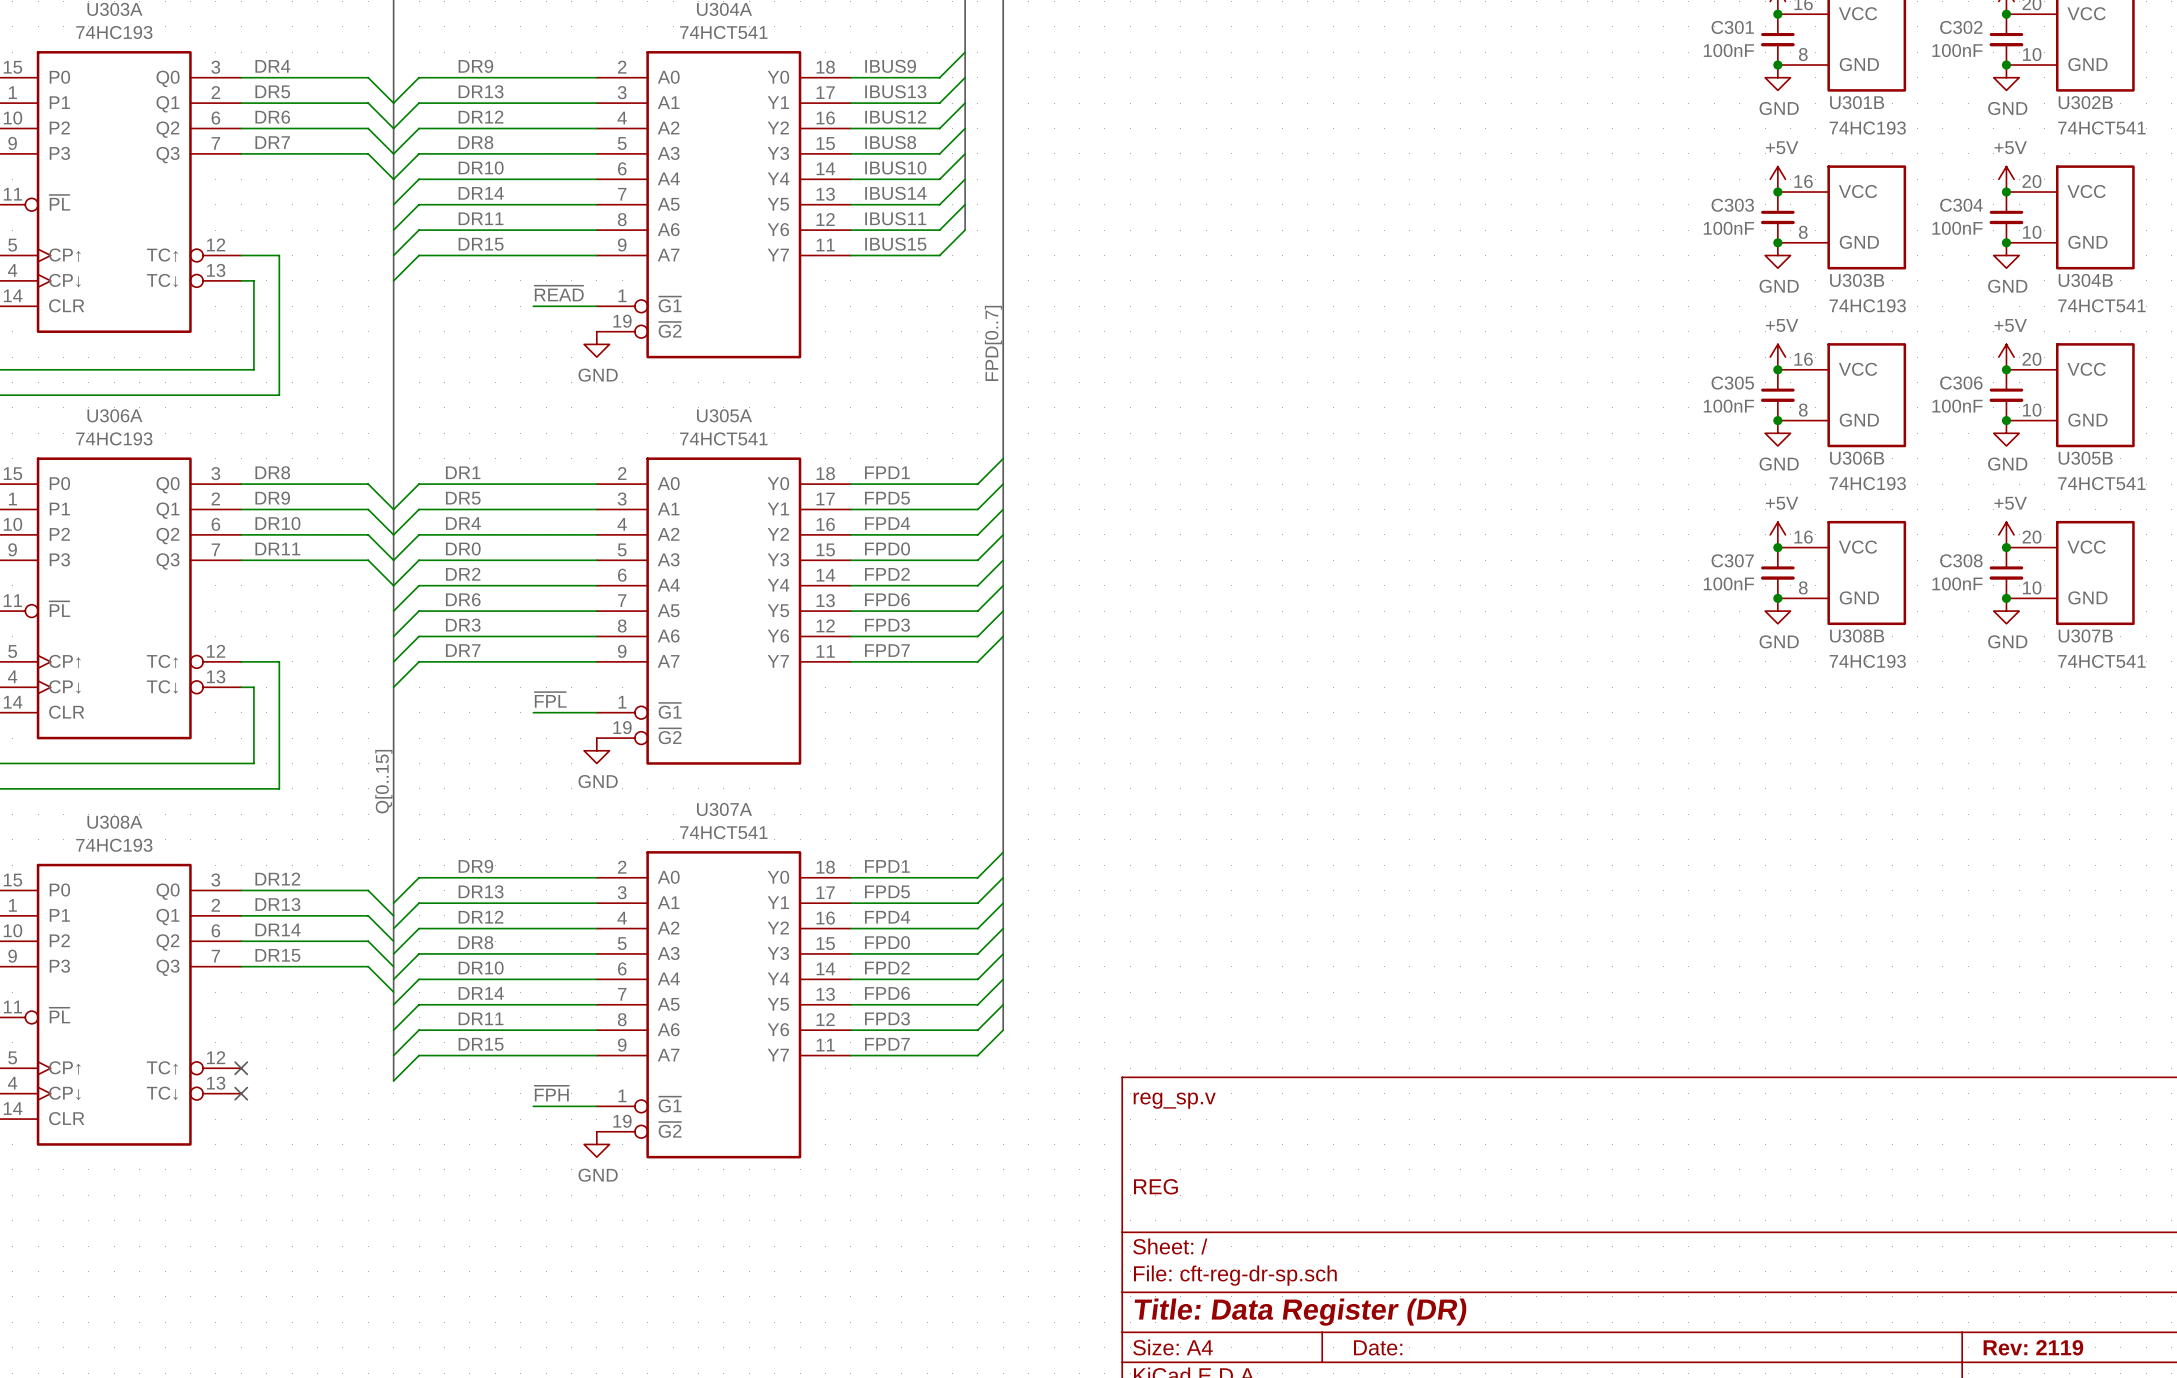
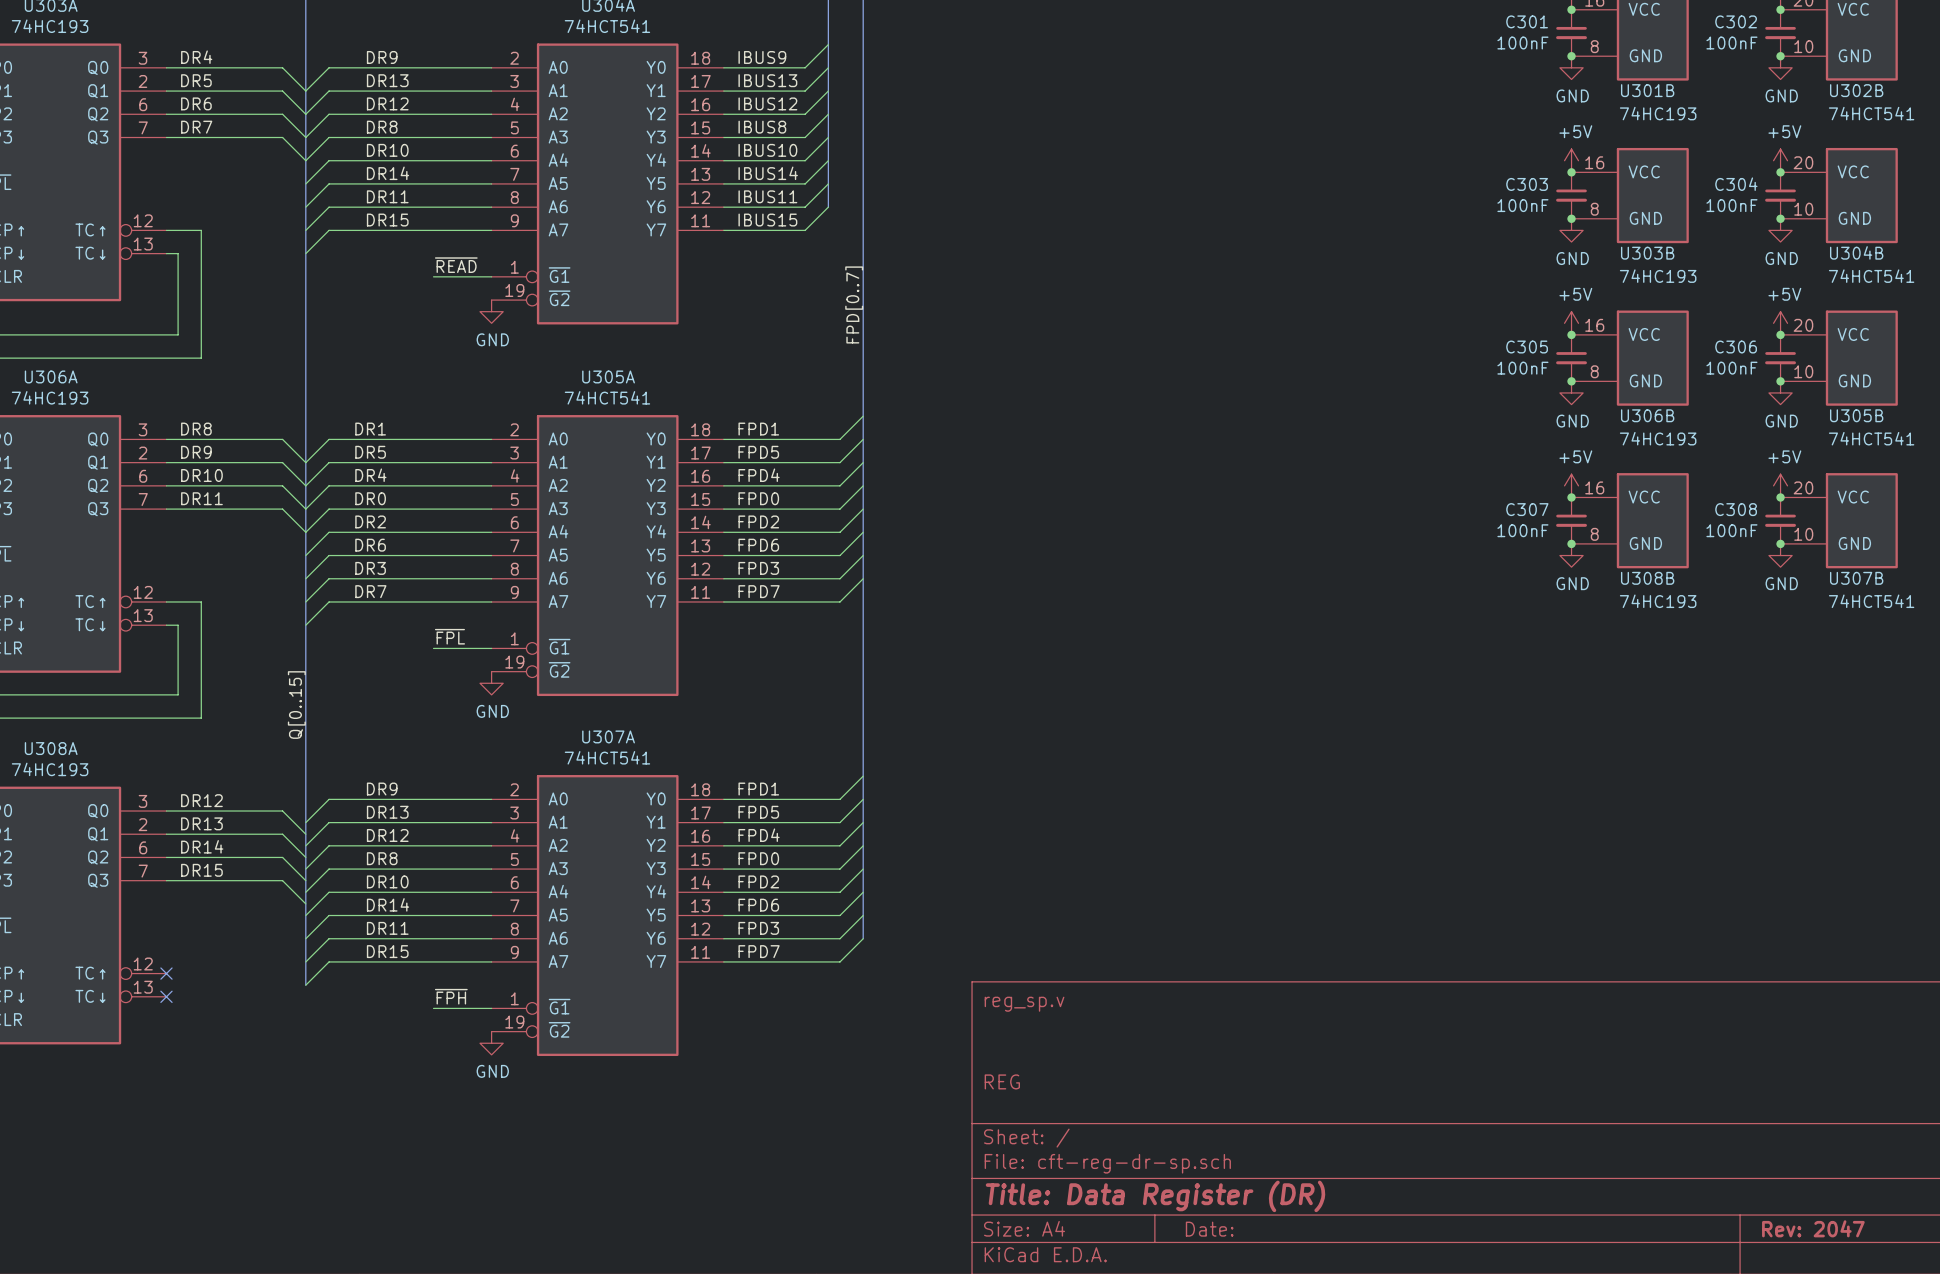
title block: Rev: 2119 (2033, 1347) -> Rev: 2047 (1813, 1228)

